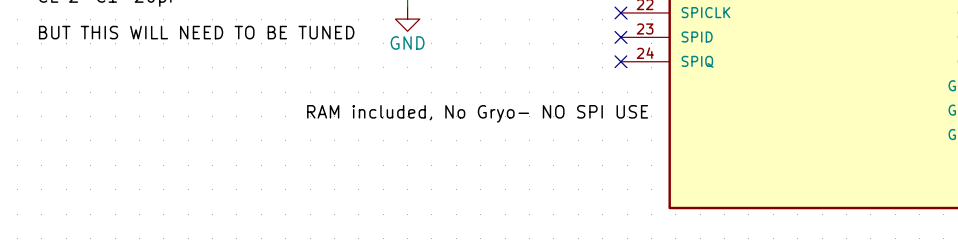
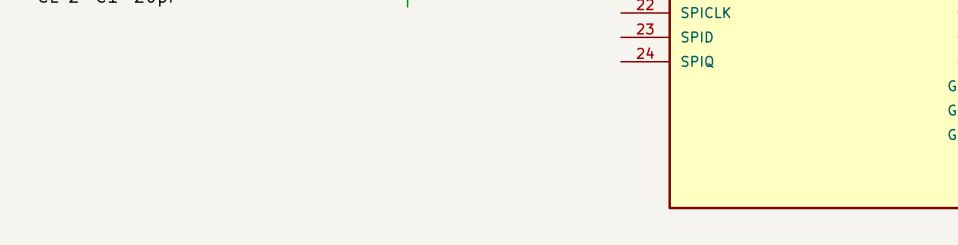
no-connect mark: (620, 12) -> none
power symbol: GND (407, 19) -> none
label: BUT THIS WILL NEED TO BE TUNED (196, 32) -> none
no-connect mark: (620, 37) -> none
no-connect mark: (620, 61) -> none
label: RAM included, No Gryo- NO SPI USE (477, 113) -> none

